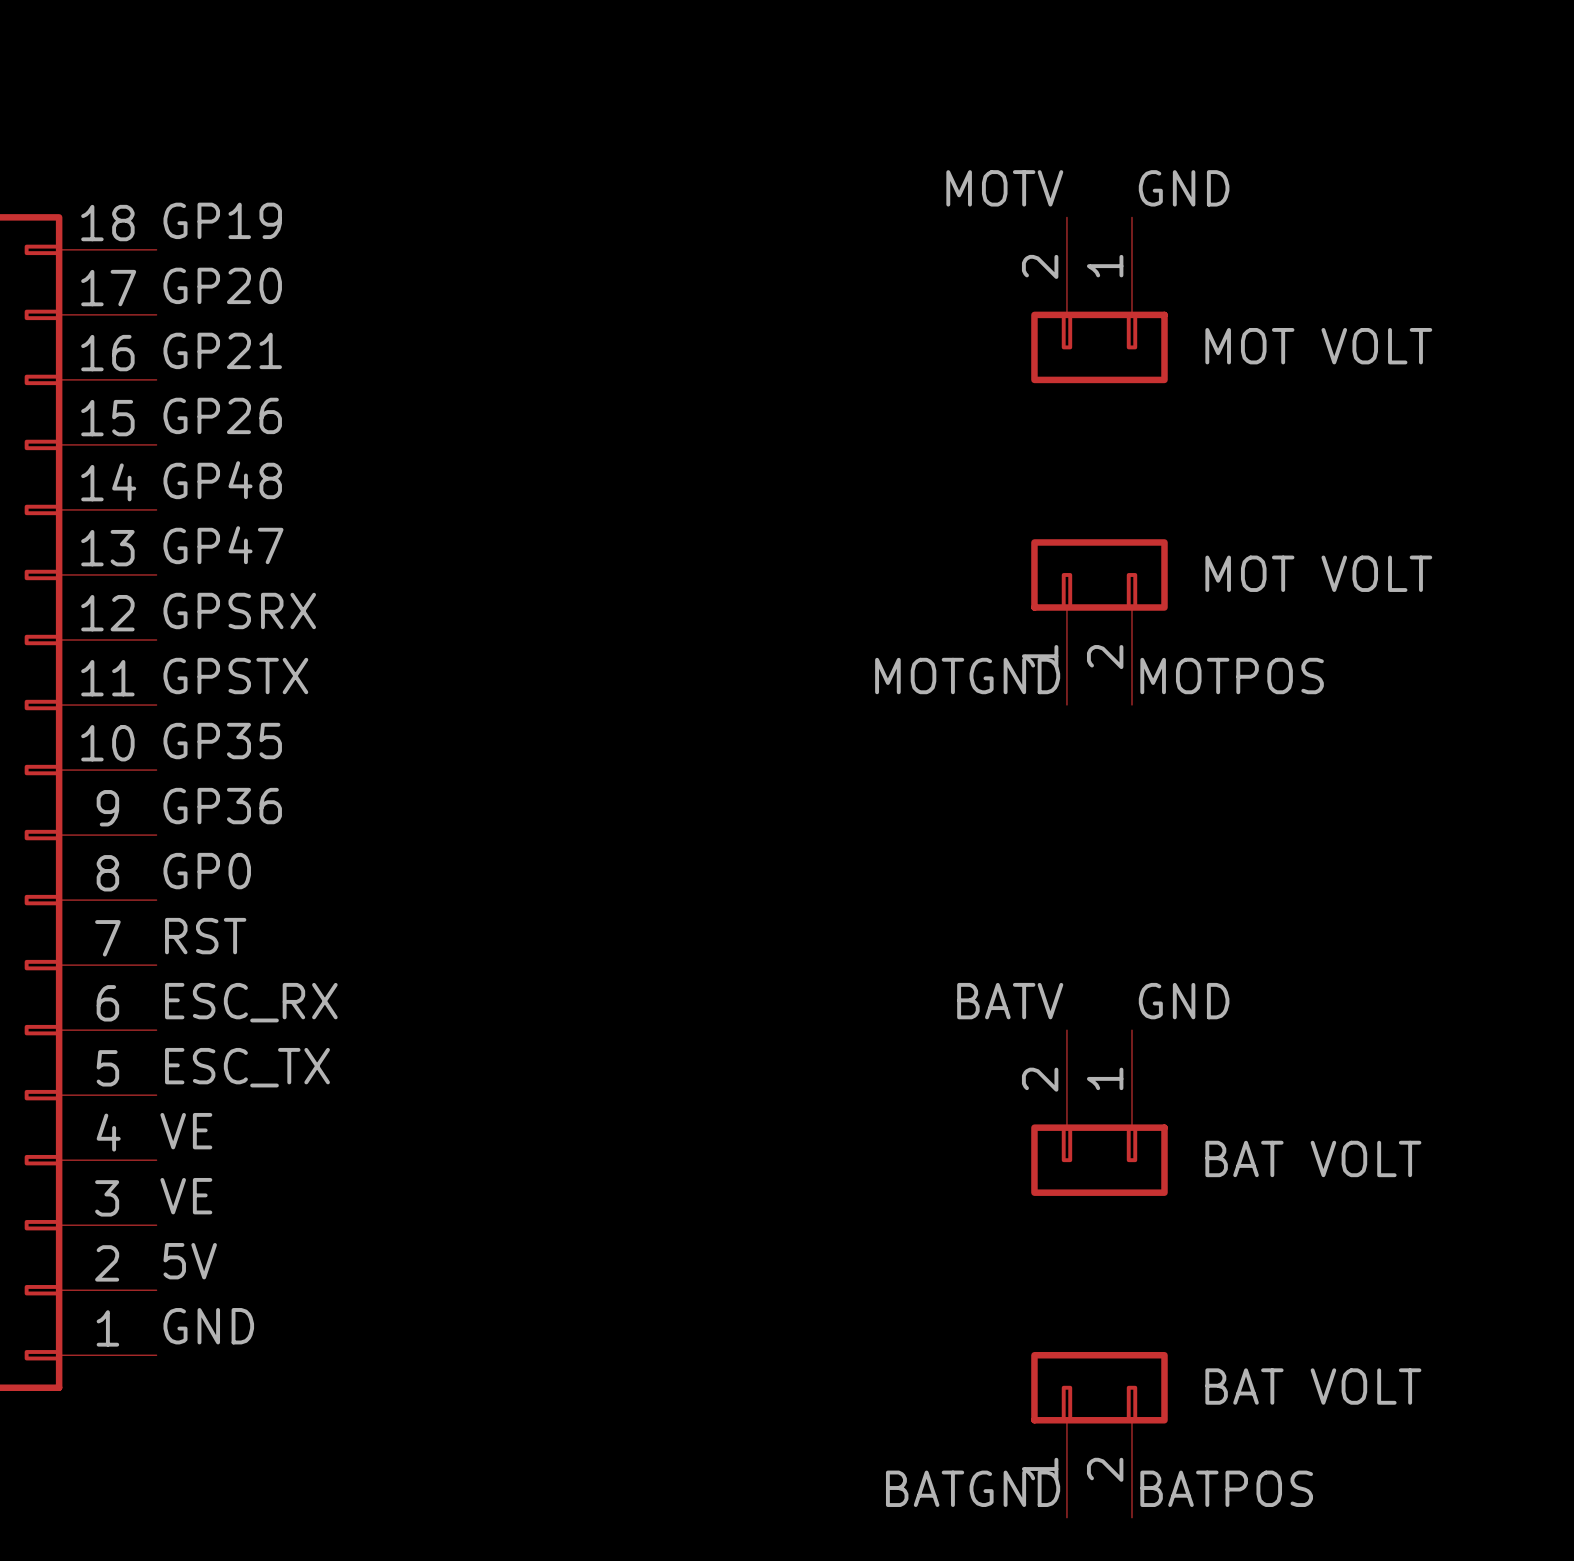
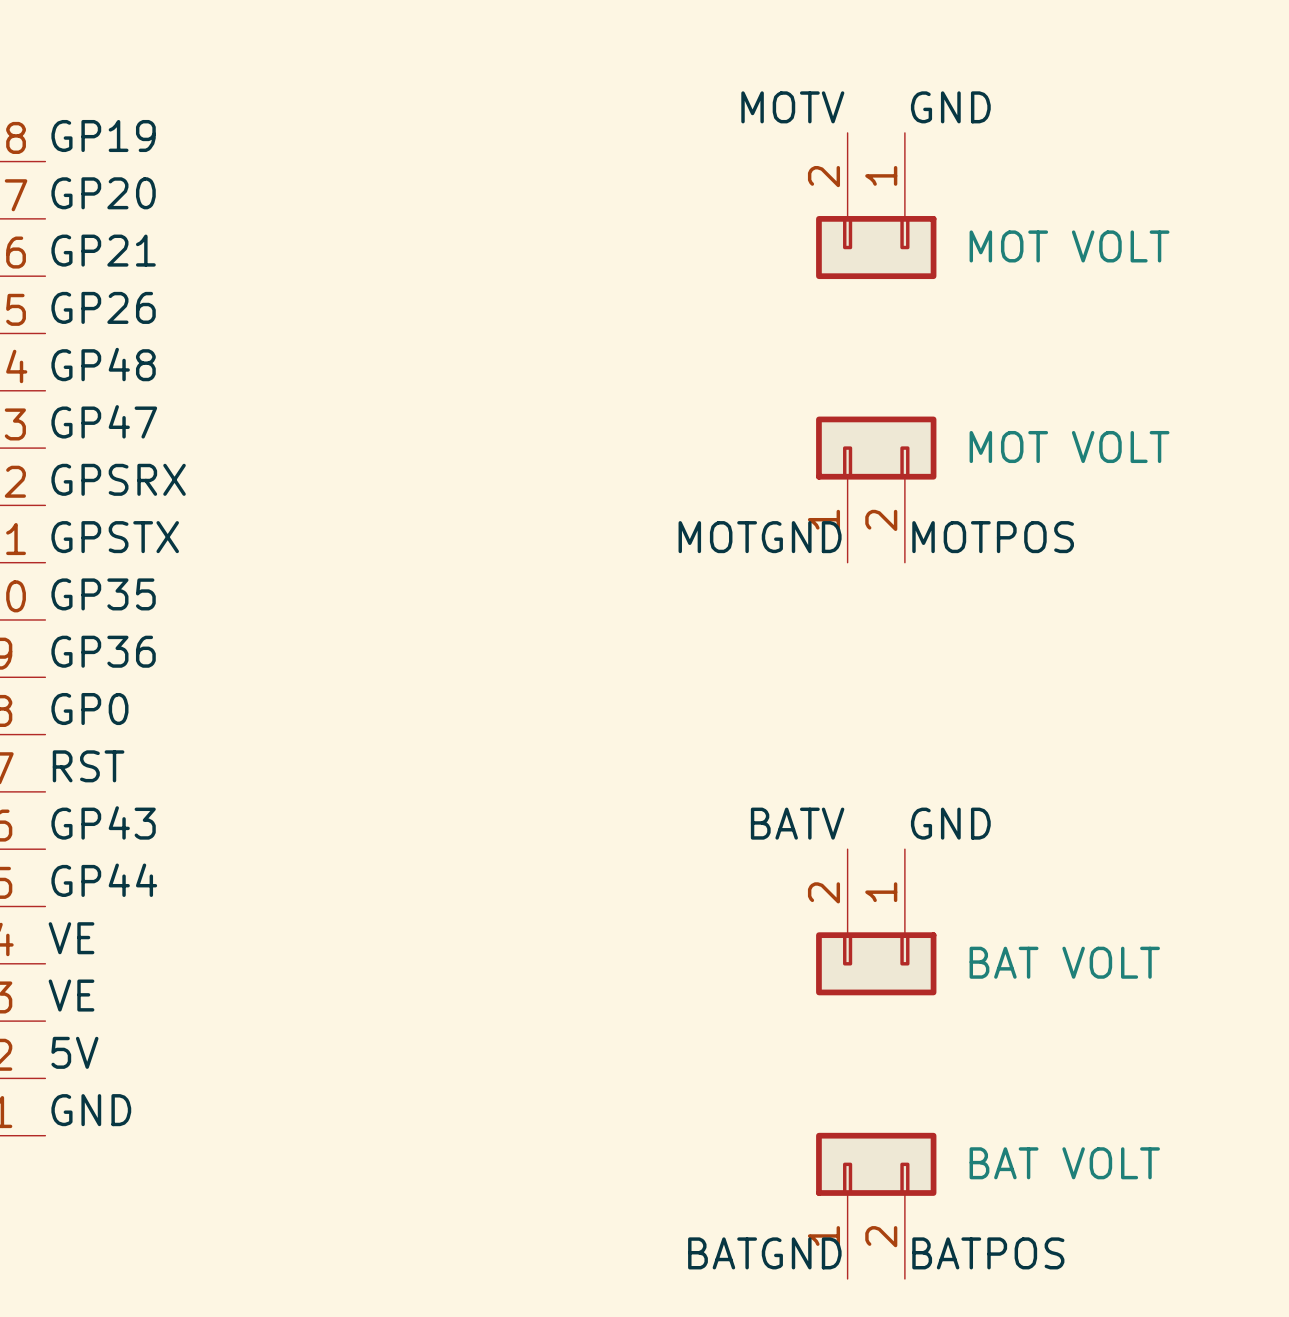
label: ESC_RX (251, 1002) -> GP43 (103, 822)
label: ESC_TX (247, 1067) -> GP44 (104, 880)

